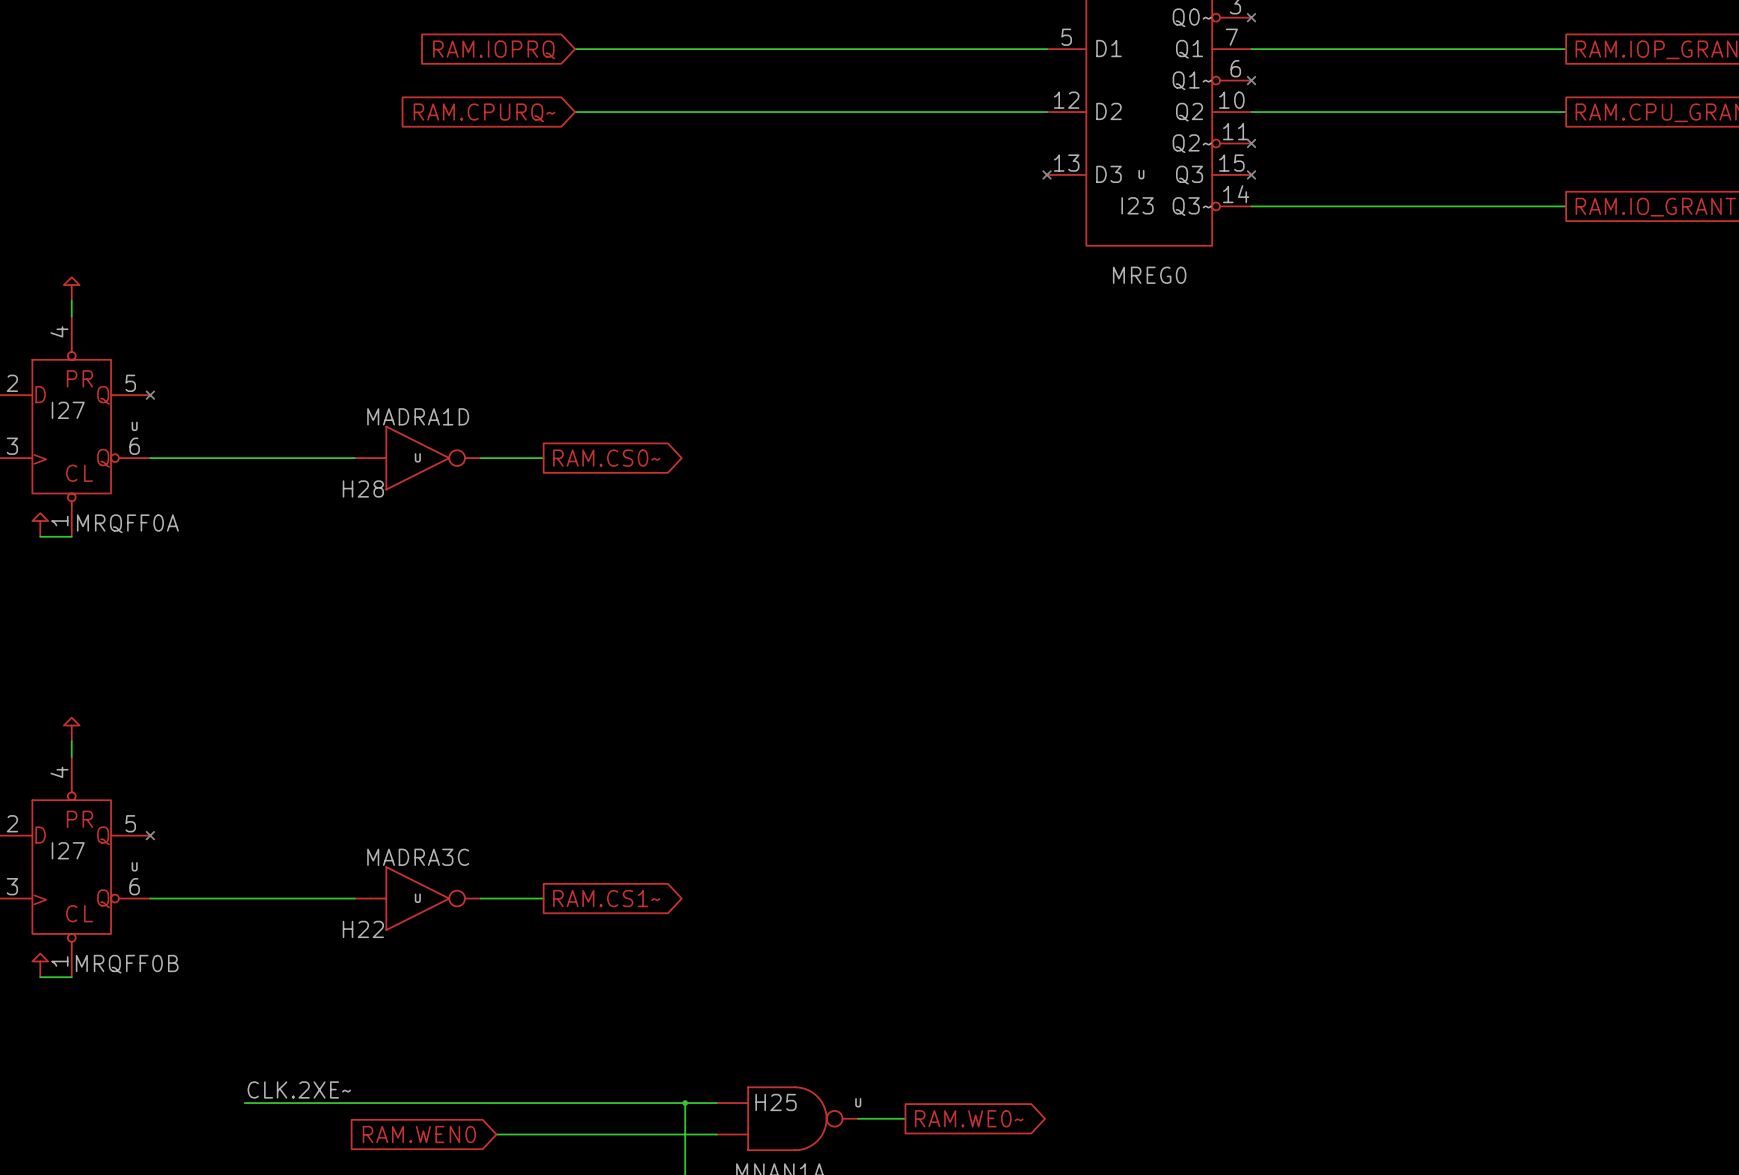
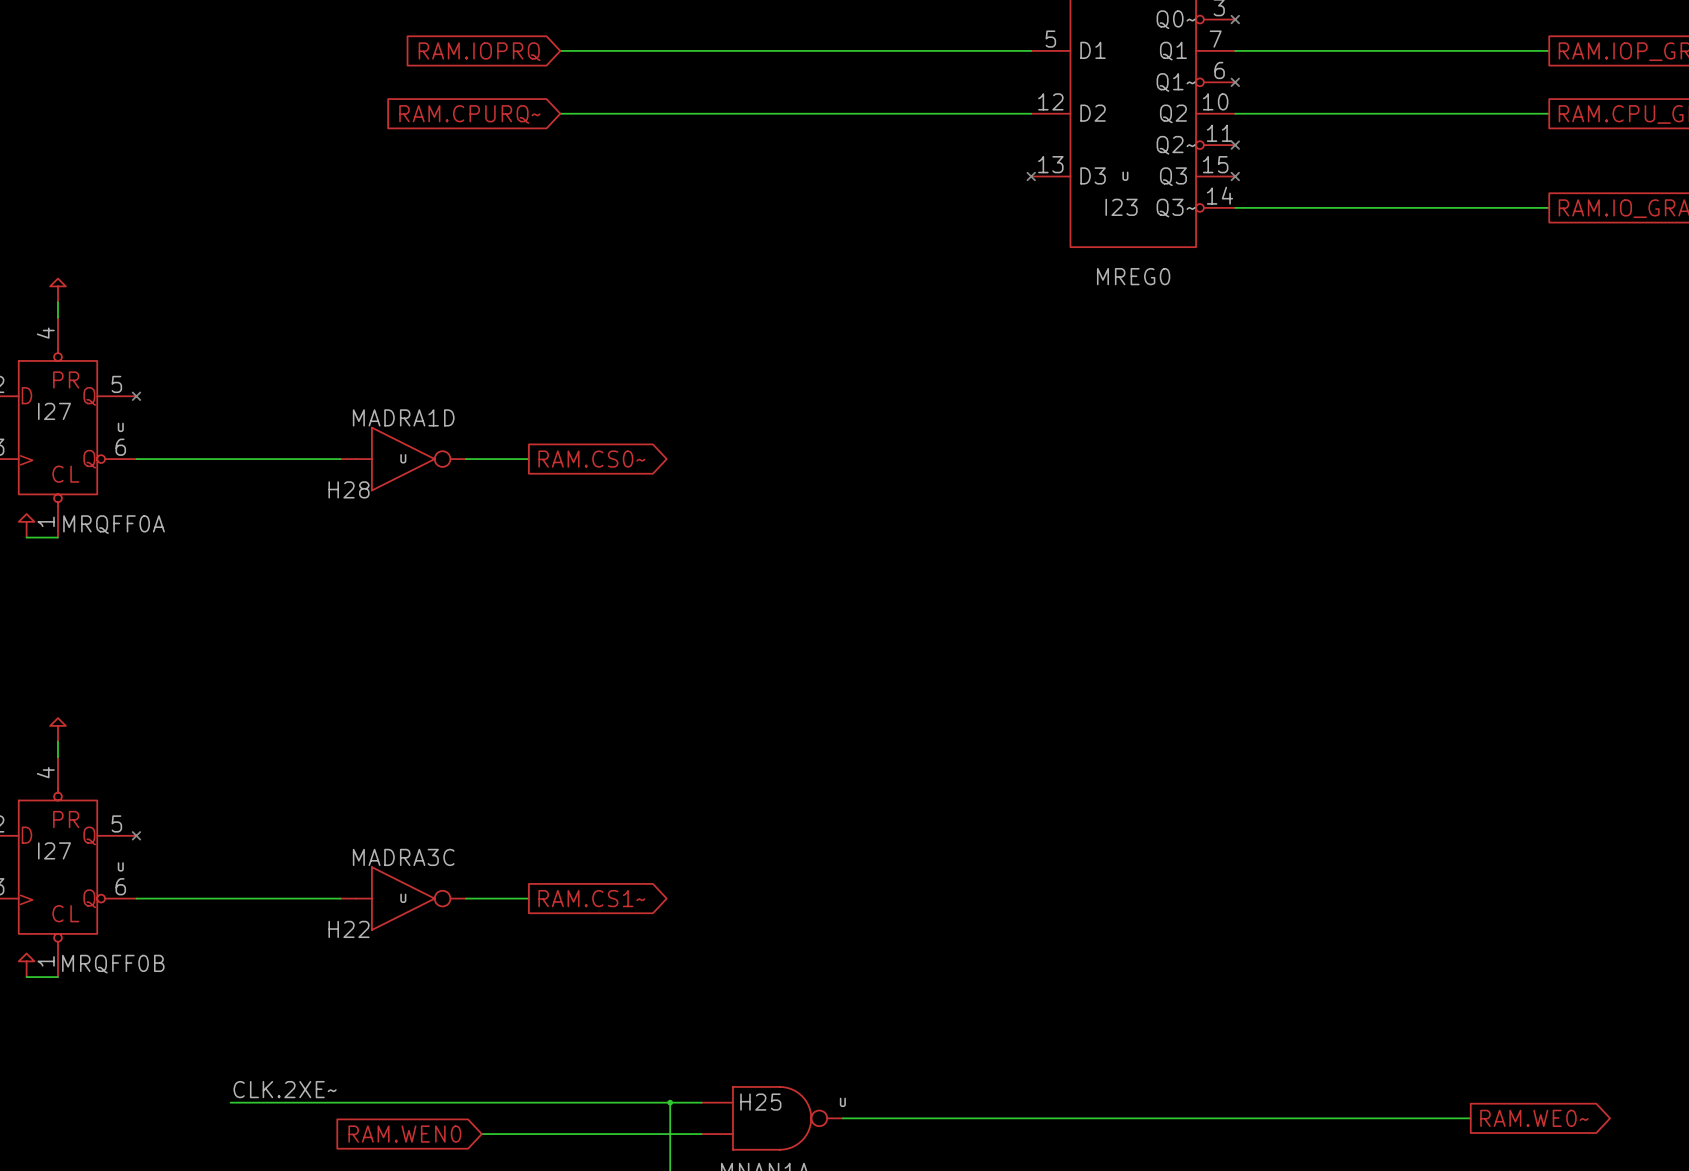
wire: none -> (889, 1118) (1470, 1118)
global label: RAM.WE0~ (969, 1118) -> none
global label: none -> RAM.WE0~ (1534, 1118)

